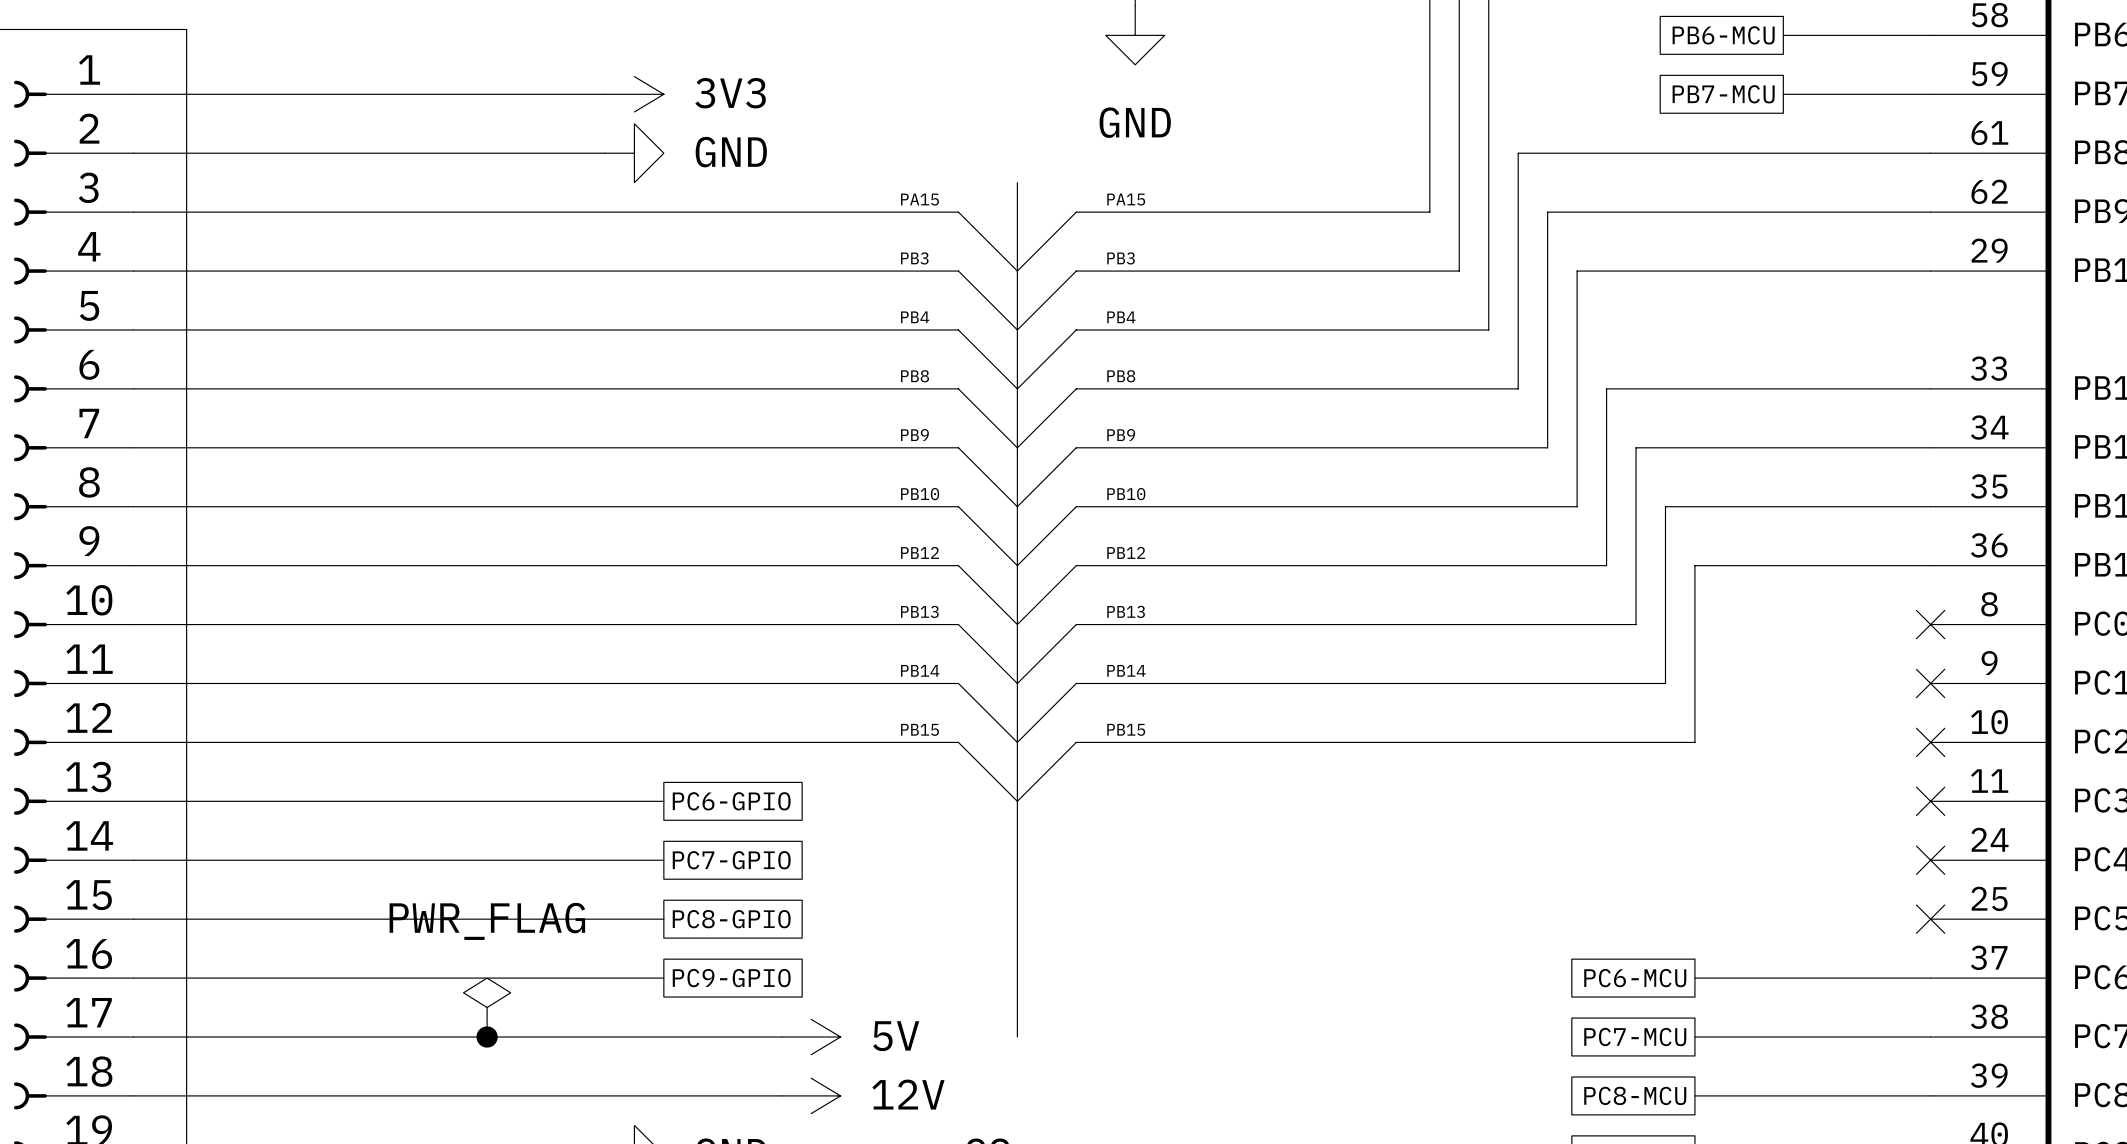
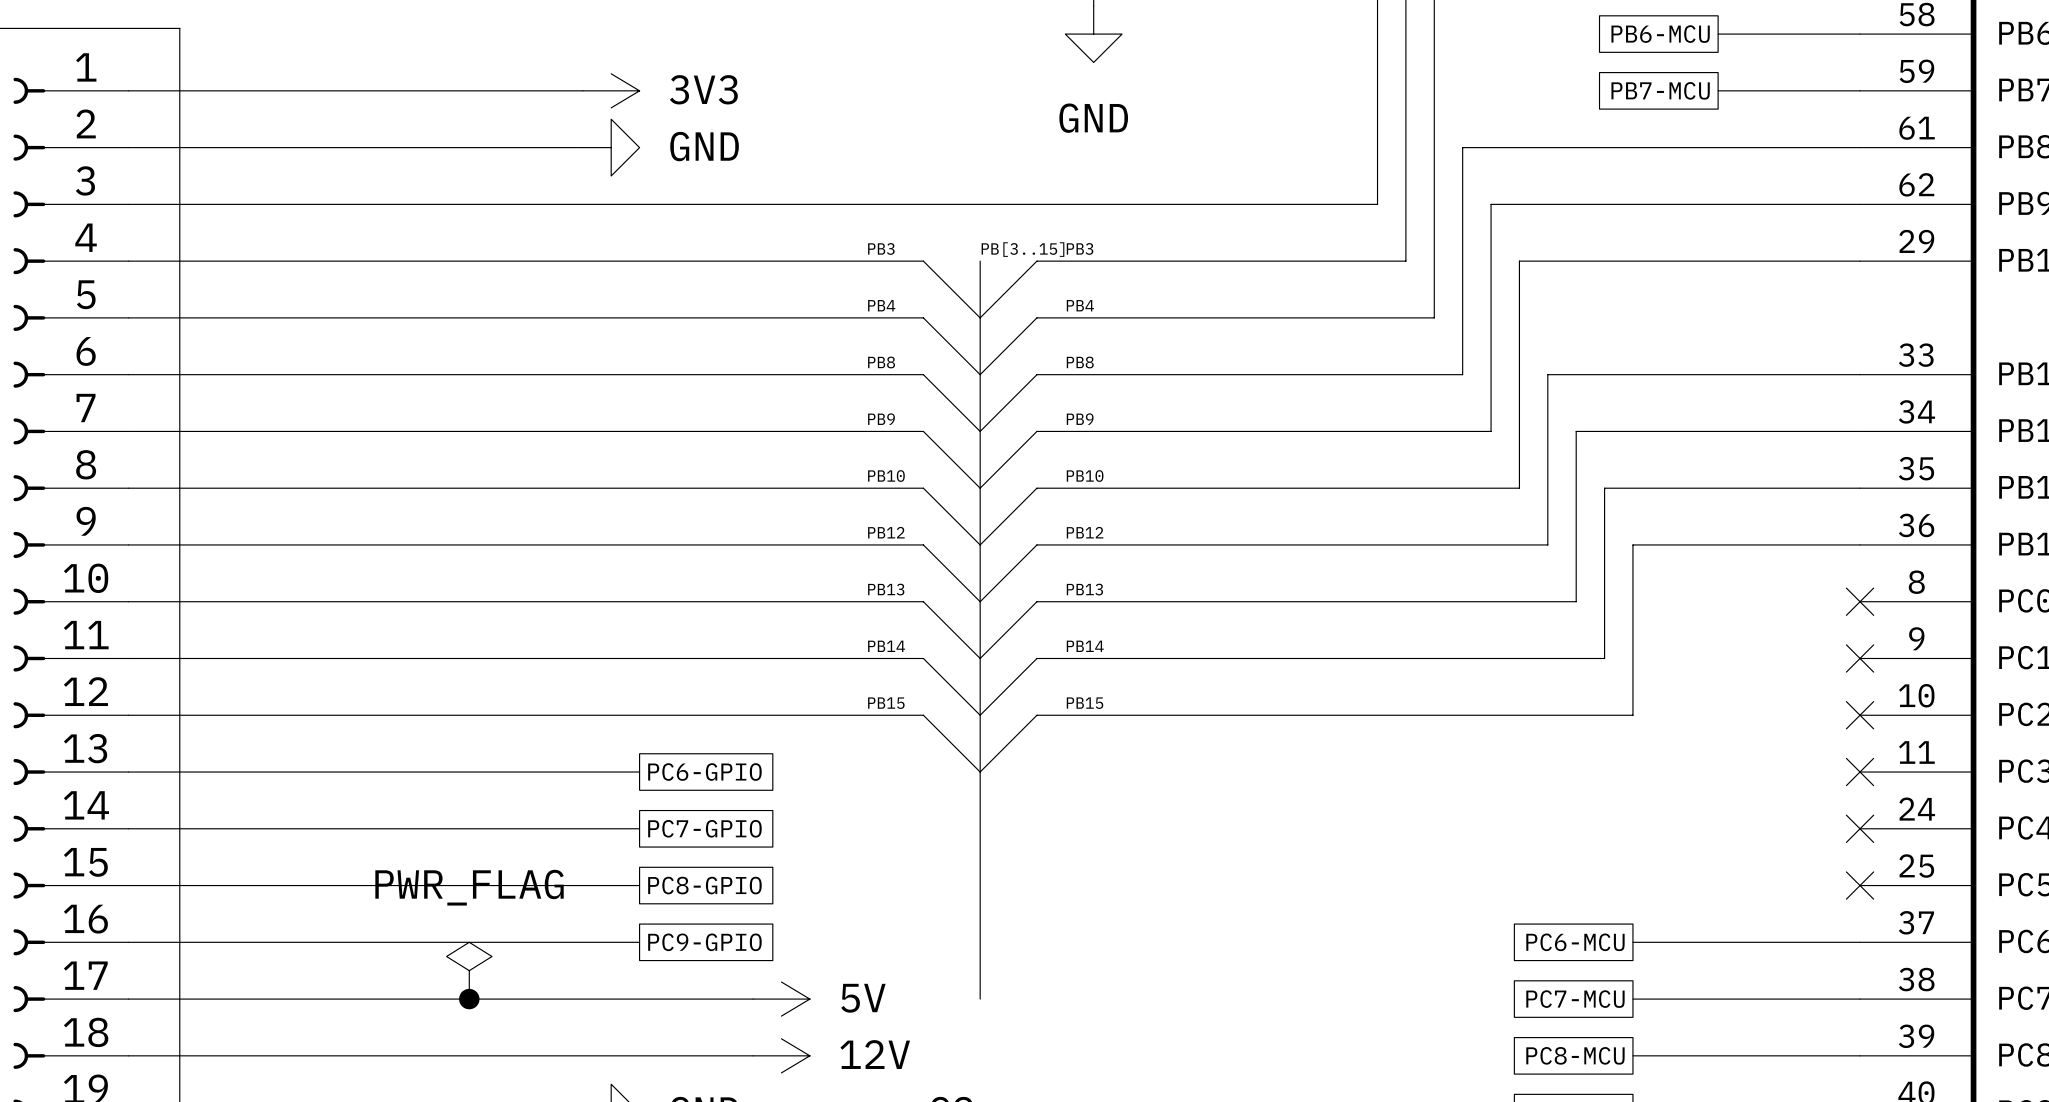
bus: (1017, 182) (1017, 271) -> none
label: PA15 (919, 199) -> none
label: PA15 (1126, 199) -> none
wire: (958, 212) (1017, 271) (1076, 212) -> (923, 204) (1036, 204)
label: none -> PB[3..15] (1022, 249)

